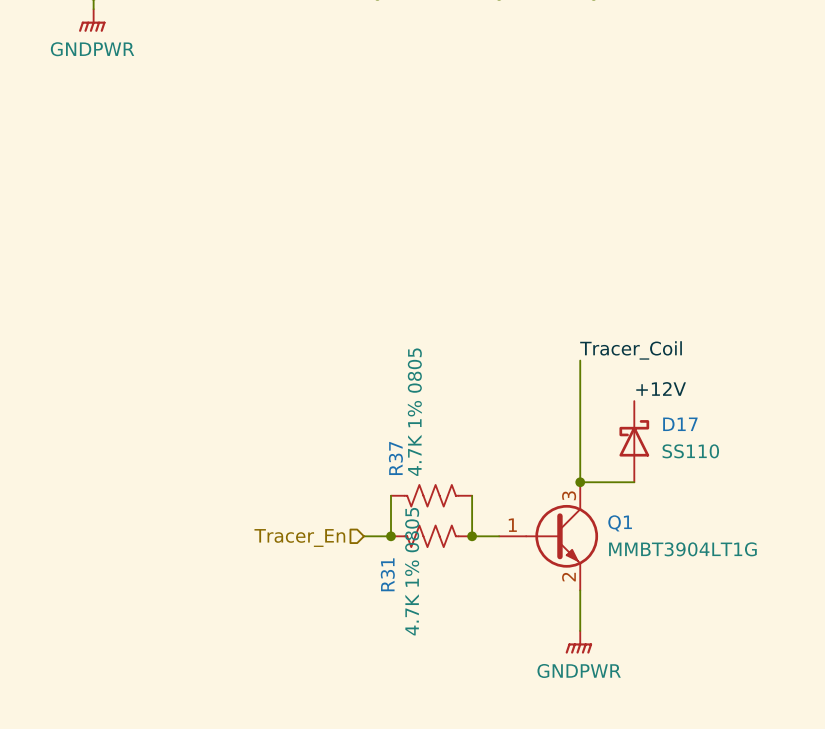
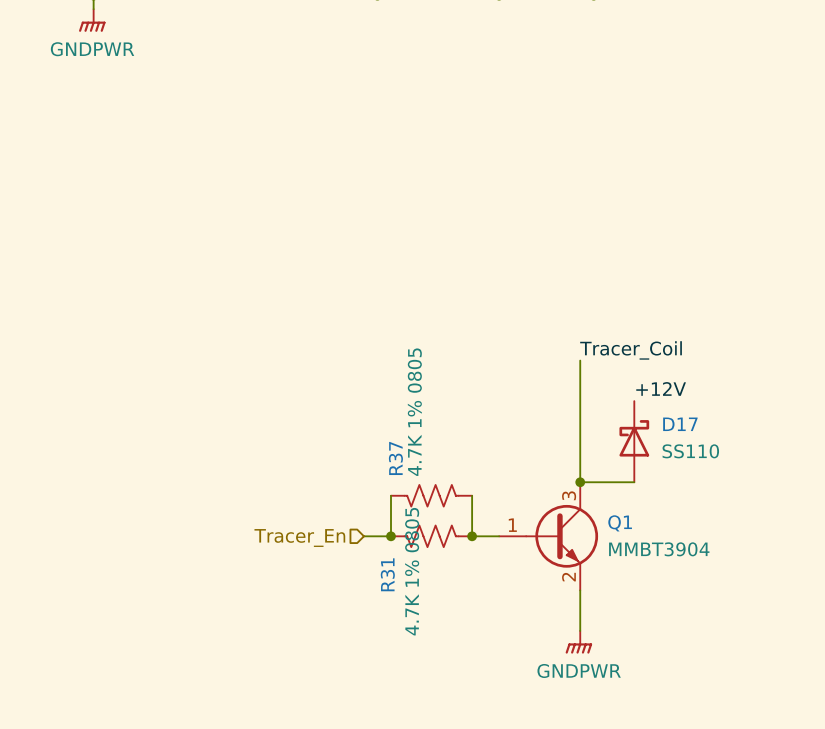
Q1 value: MMBT3904LT1G (682, 549) -> MMBT3904 (659, 549)

